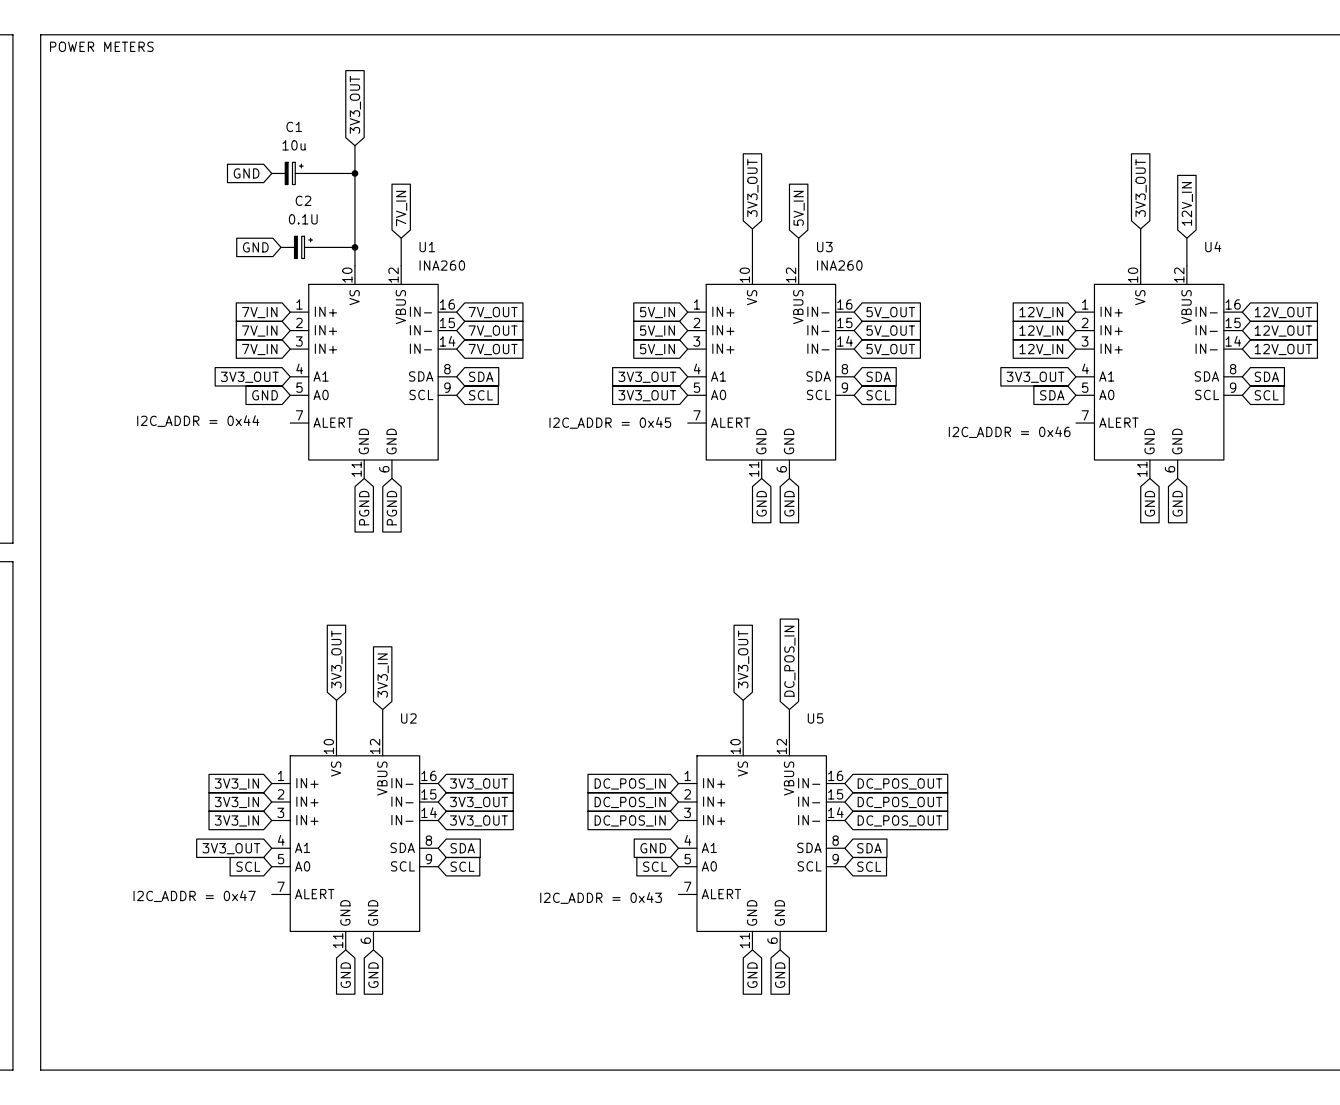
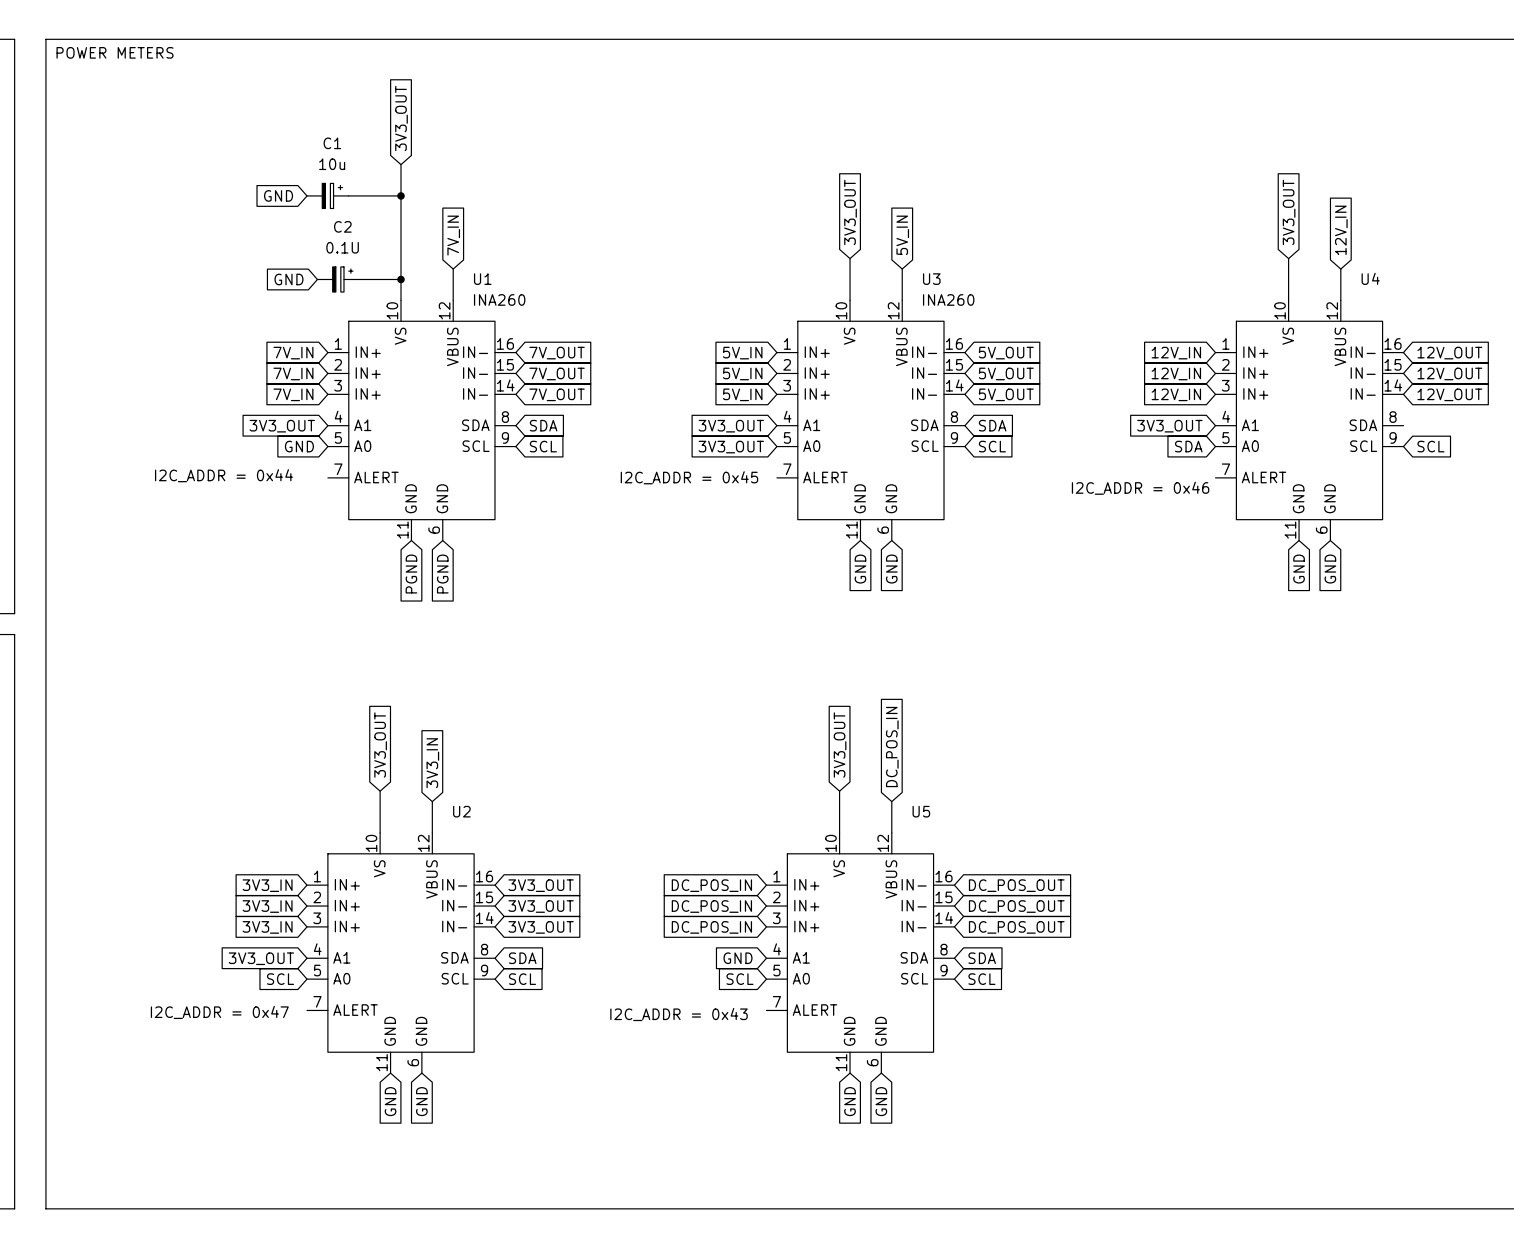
global label: SDA (1266, 376) -> none

